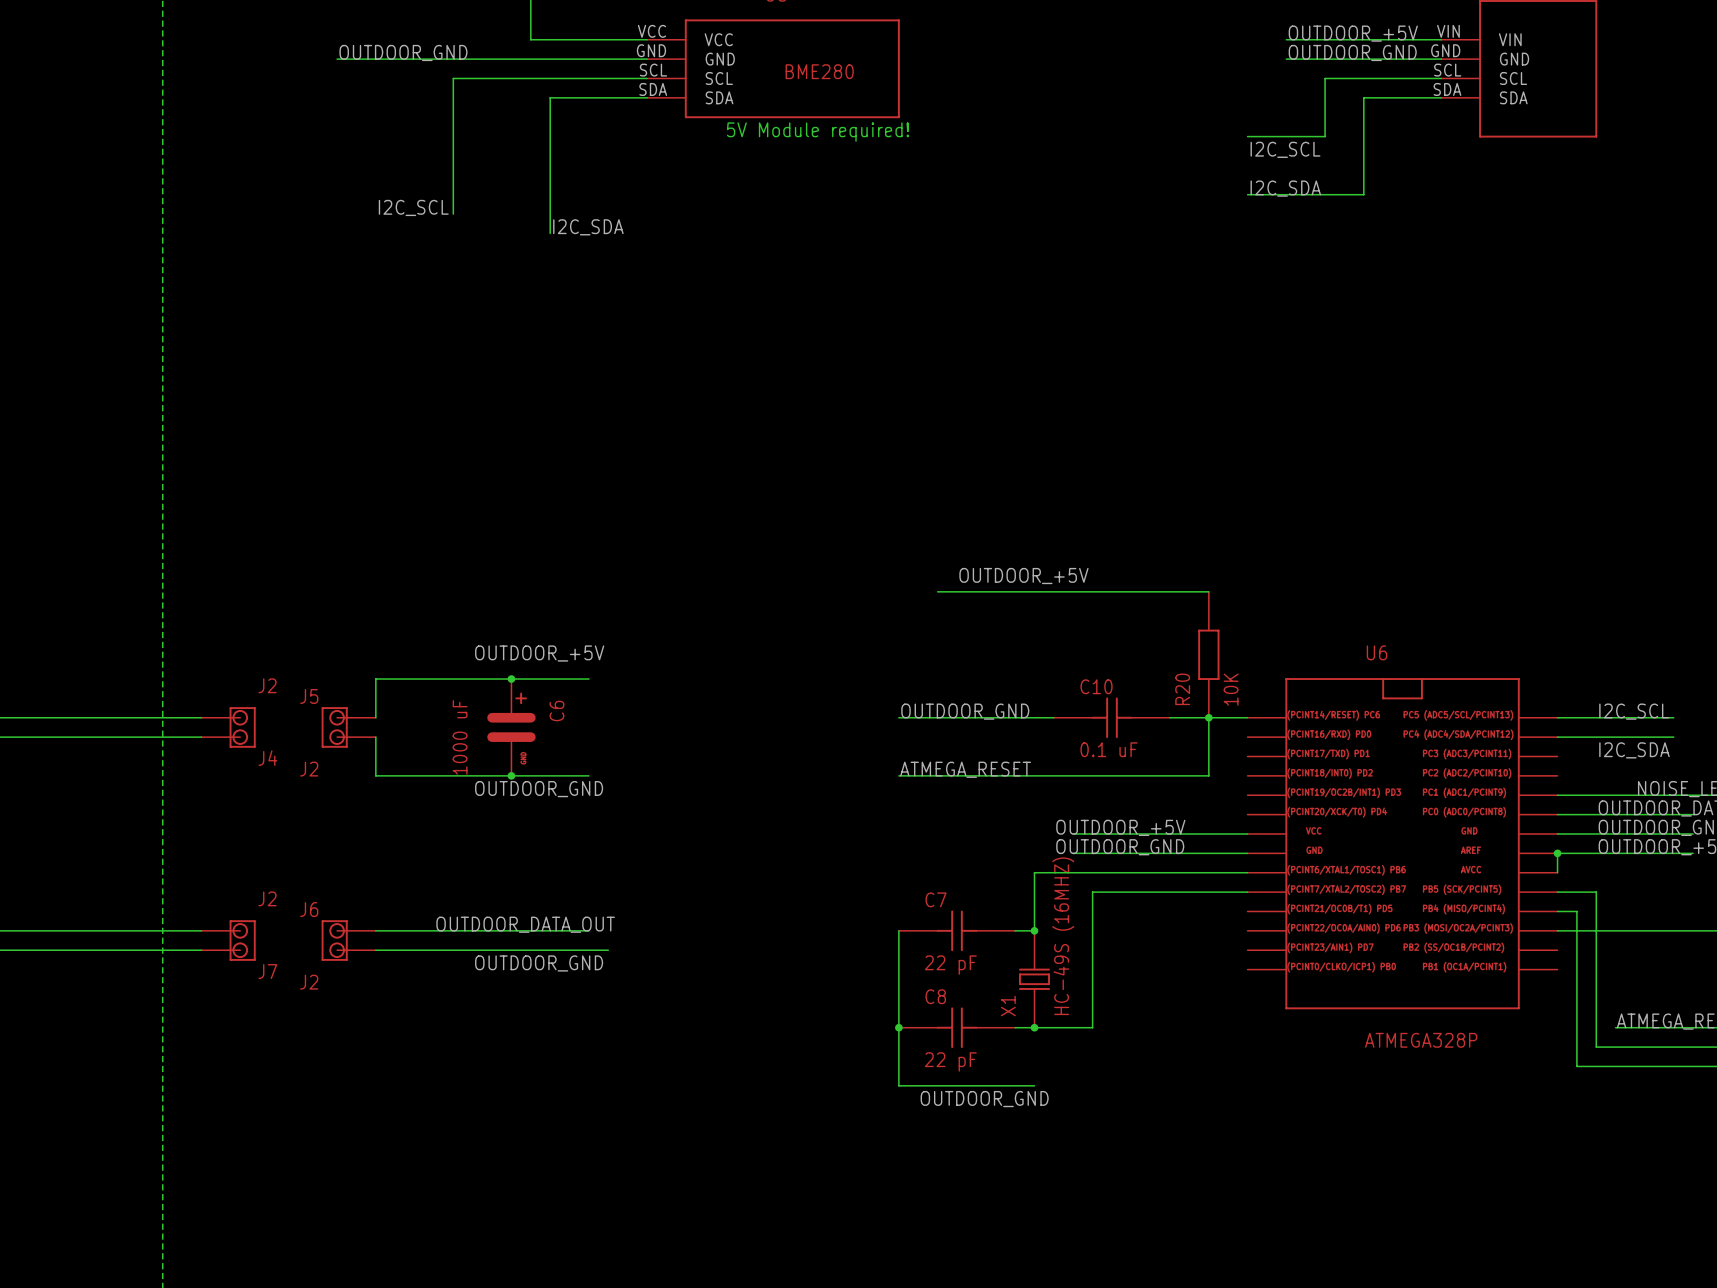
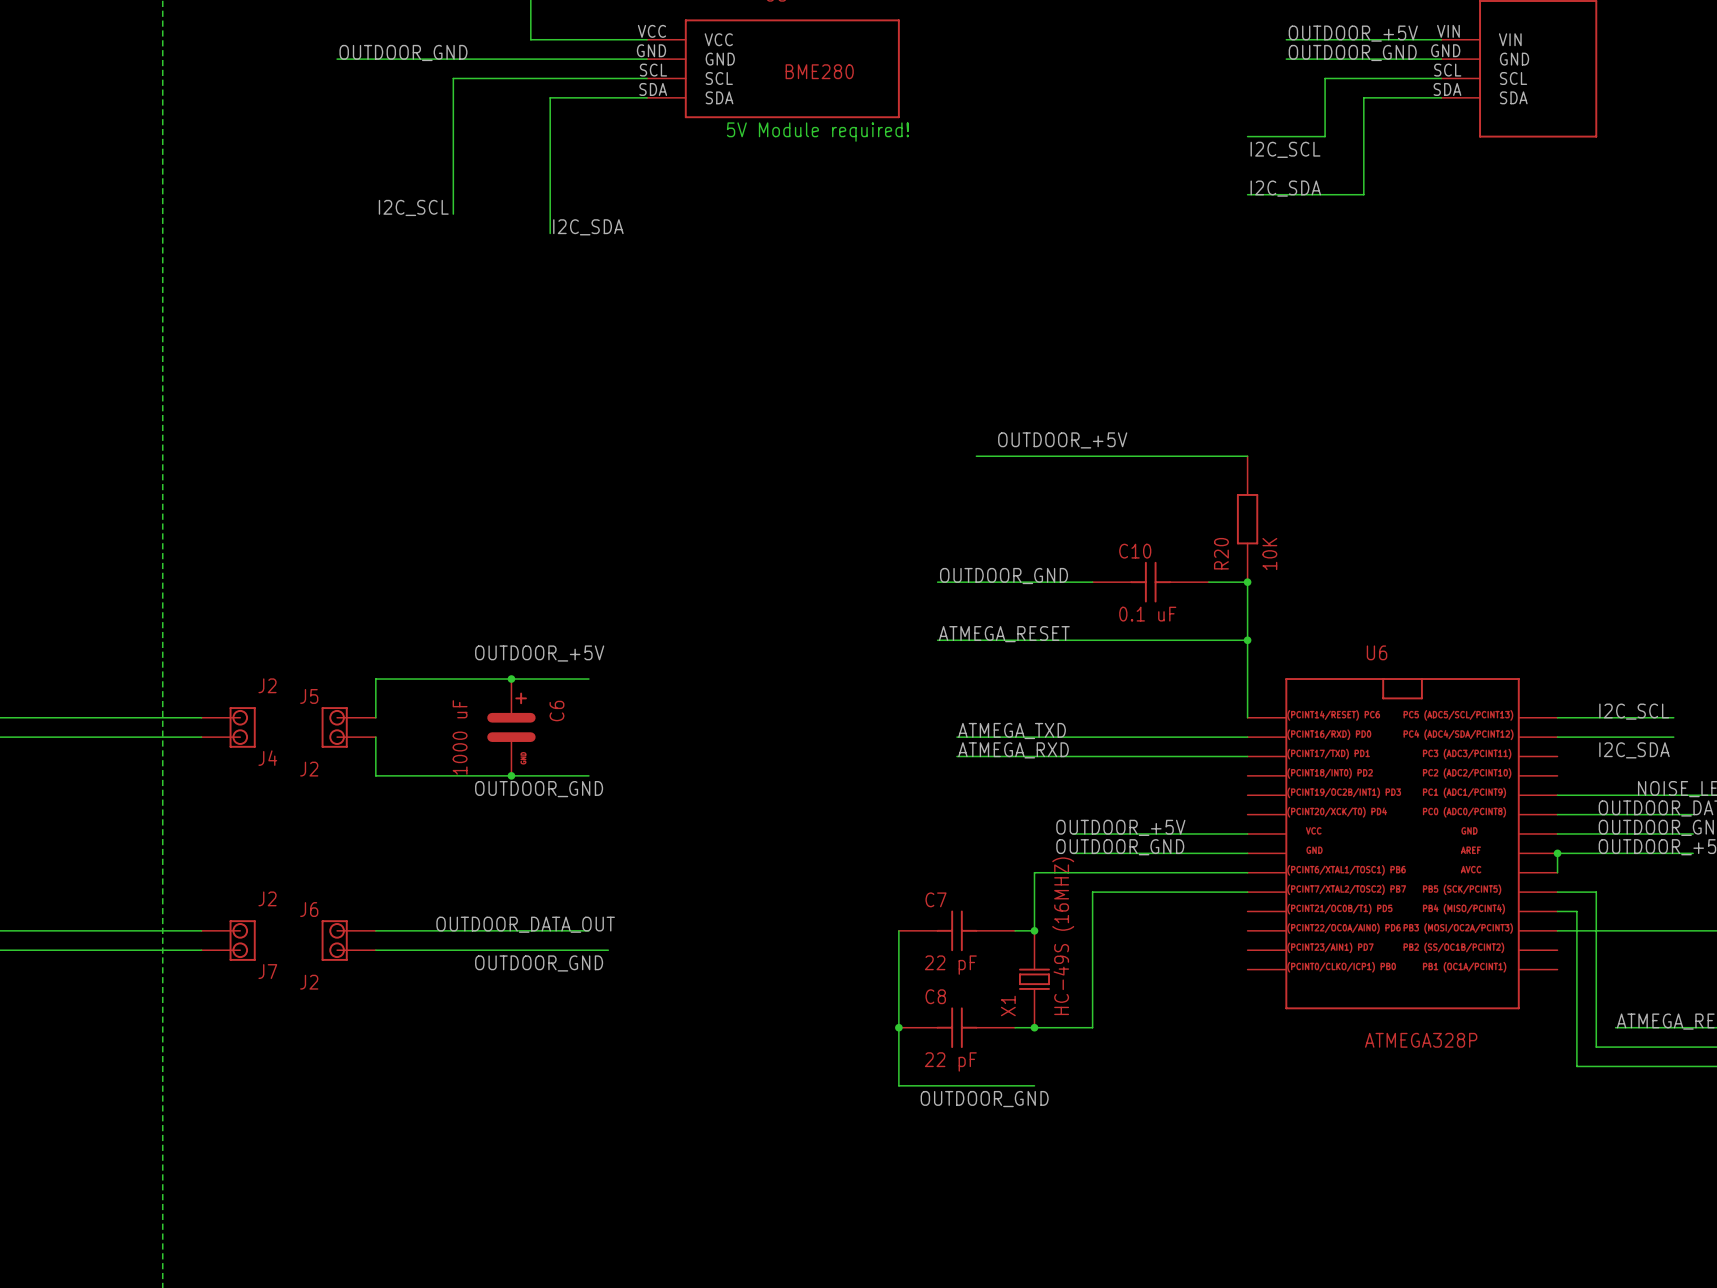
label position: OUTDOOR_+5V (1023, 576) -> OUTDOOR_+5V (1062, 440)
junction: none -> (1247, 582)
wire: (937, 591) (1208, 591) -> (976, 456) (1247, 456)
wire: none -> (937, 640) (1247, 640)
junction: none -> (1247, 640)
R20 position: (1208, 654) -> (1247, 519)
label position: OUTDOOR_GND (965, 711) -> OUTDOOR_GND (1004, 576)
wire: (898, 717) (1053, 717) -> (937, 582) (1092, 582)
C10 position: (1111, 717) -> (1150, 582)
wire: (1170, 717) (1247, 717) -> (1208, 582) (1247, 582) (1247, 717)
wire: (1208, 717) (1208, 775) (898, 775) -> none
junction: (1208, 717) -> none
label: none -> ATMEGA_TXD (1012, 730)
wire: none -> (957, 737) (1247, 737)
label: none -> ATMEGA_RXD (1013, 750)
wire: none -> (957, 756) (1247, 756)
label position: ATMEGA_RESET (965, 769) -> ATMEGA_RESET (1004, 634)

